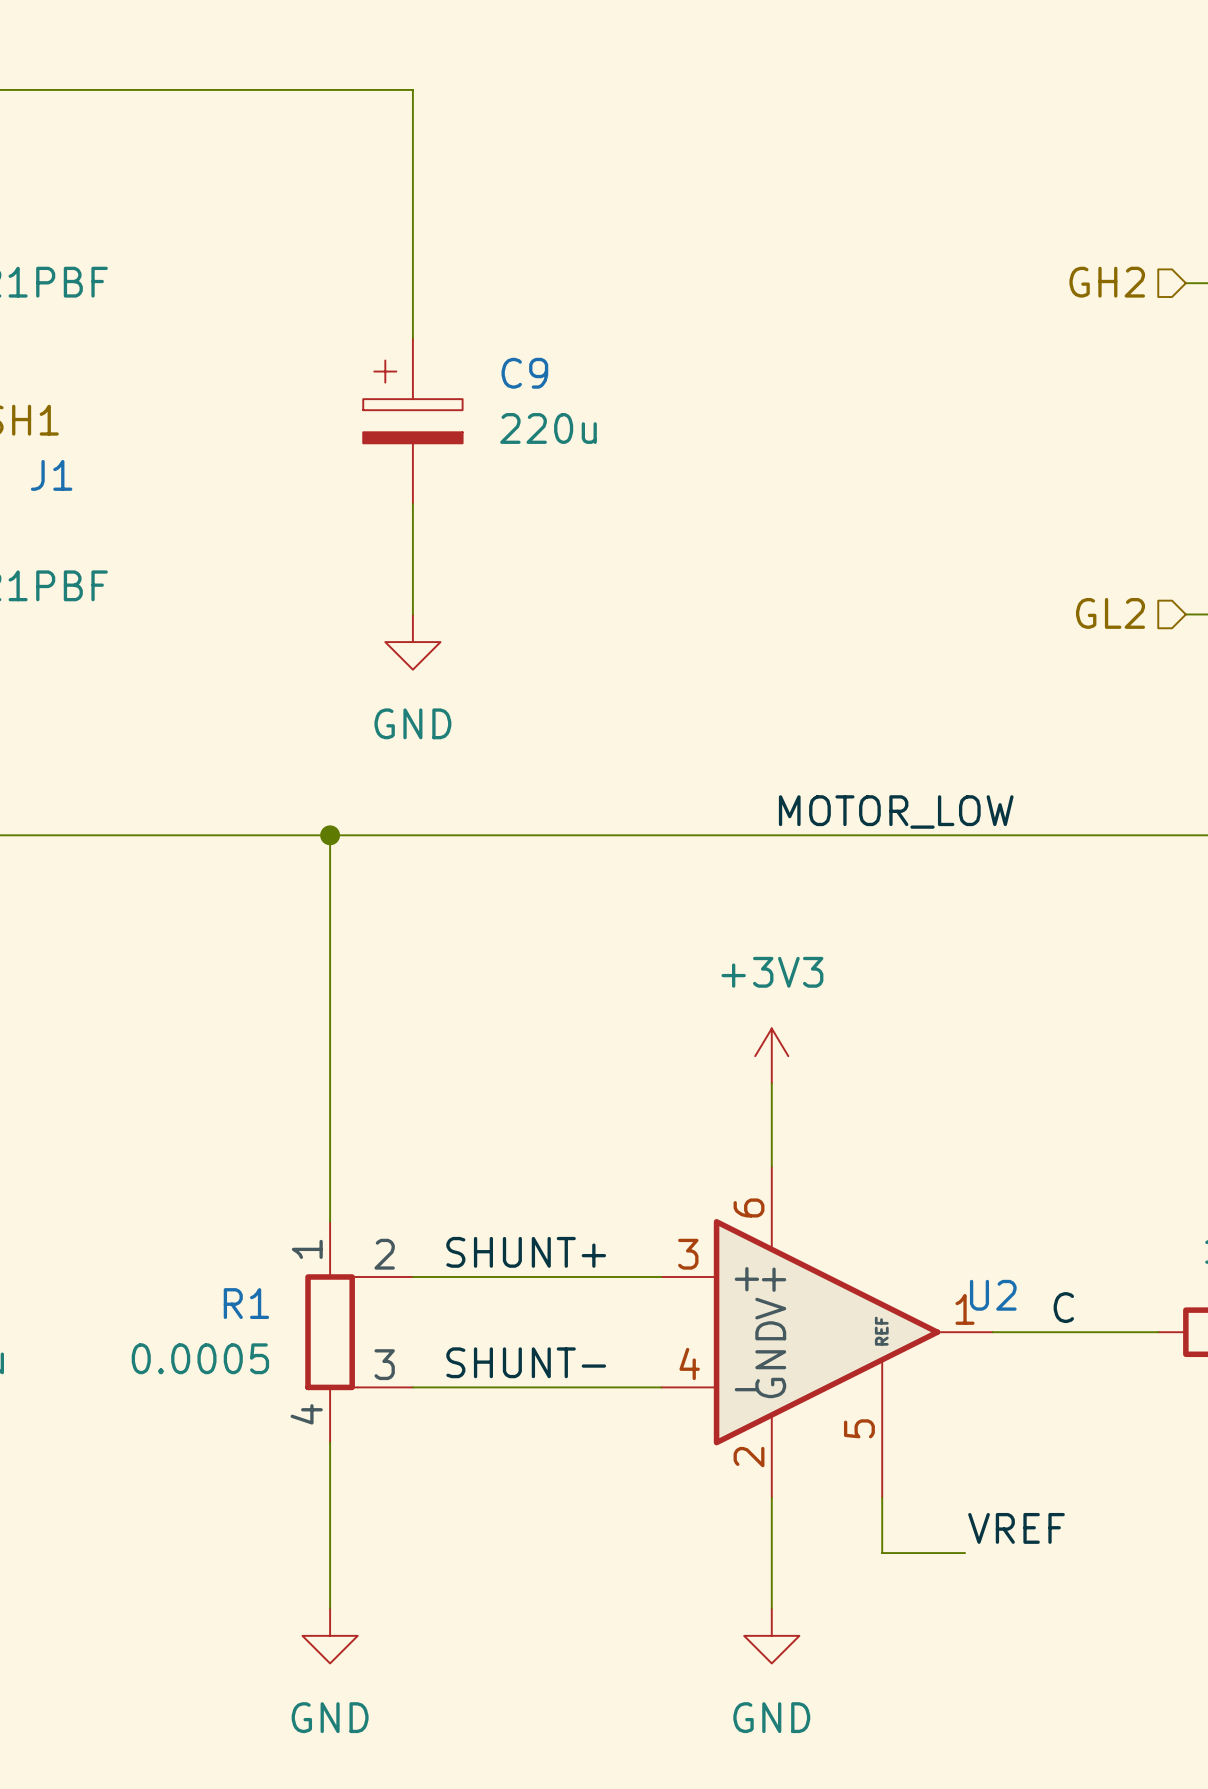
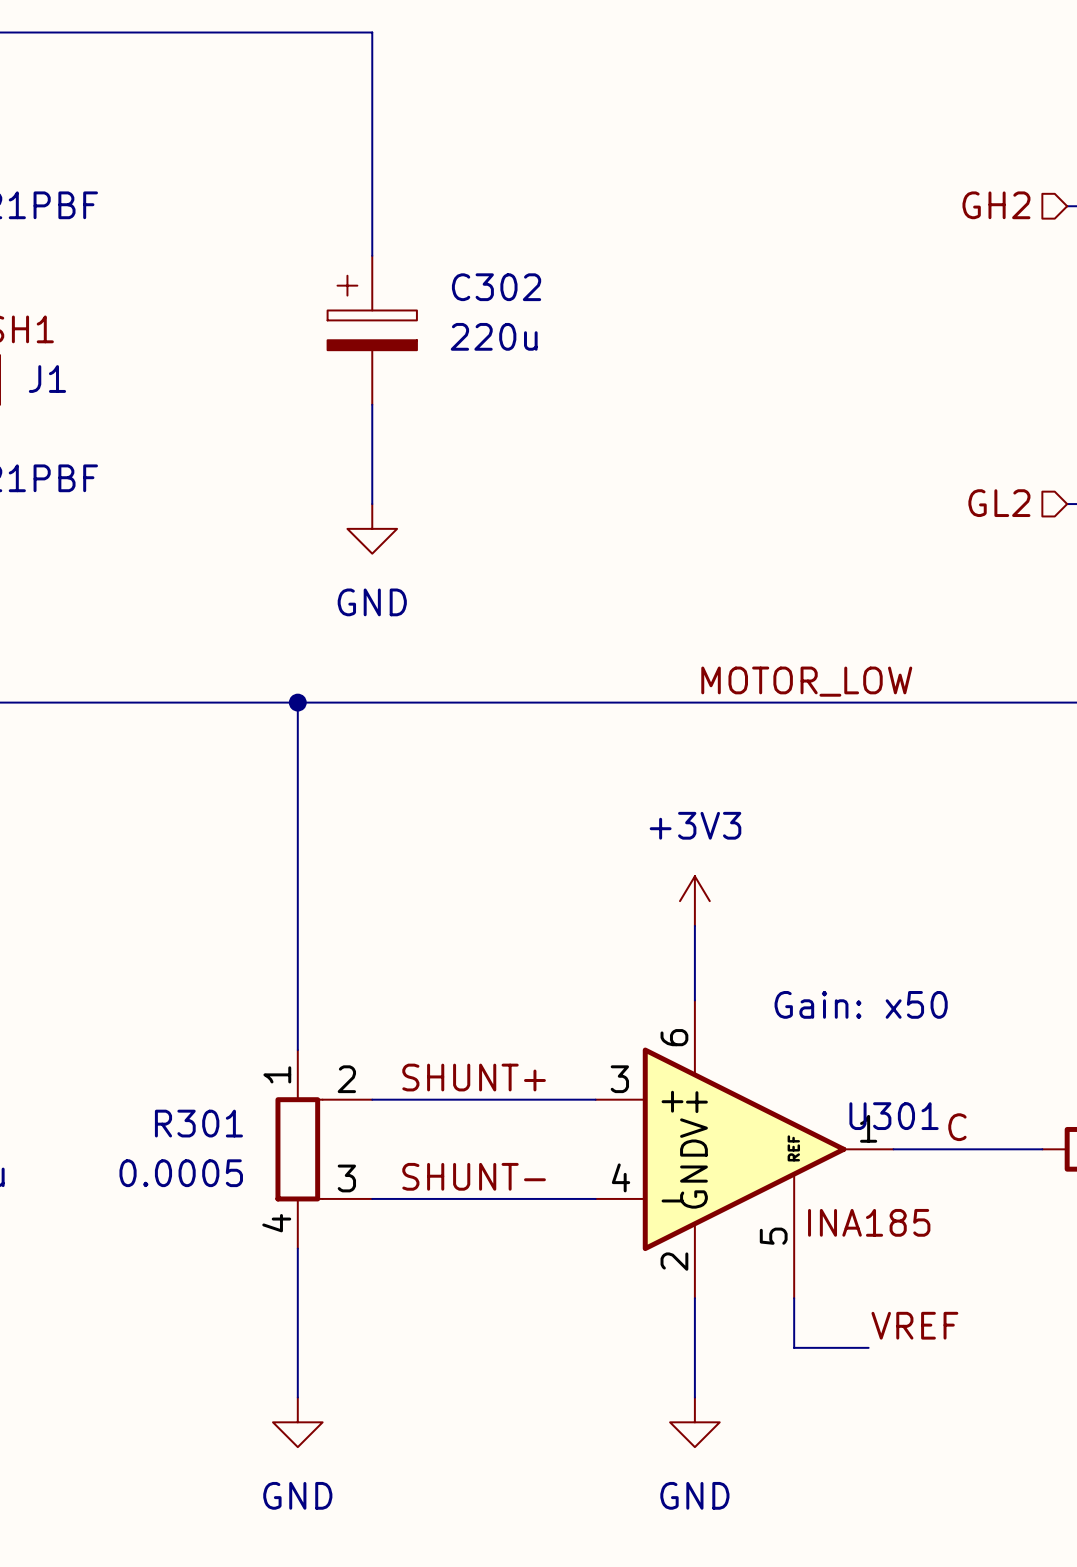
C9 name: C9 (524, 373) -> C302 (496, 287)
text: none -> Gain: x50 (861, 1004)
U2 name: U2 (993, 1295) -> U301 (894, 1116)
R1 name: R1 (246, 1303) -> R301 (198, 1123)
U2 text: none -> INA185 (869, 1222)

